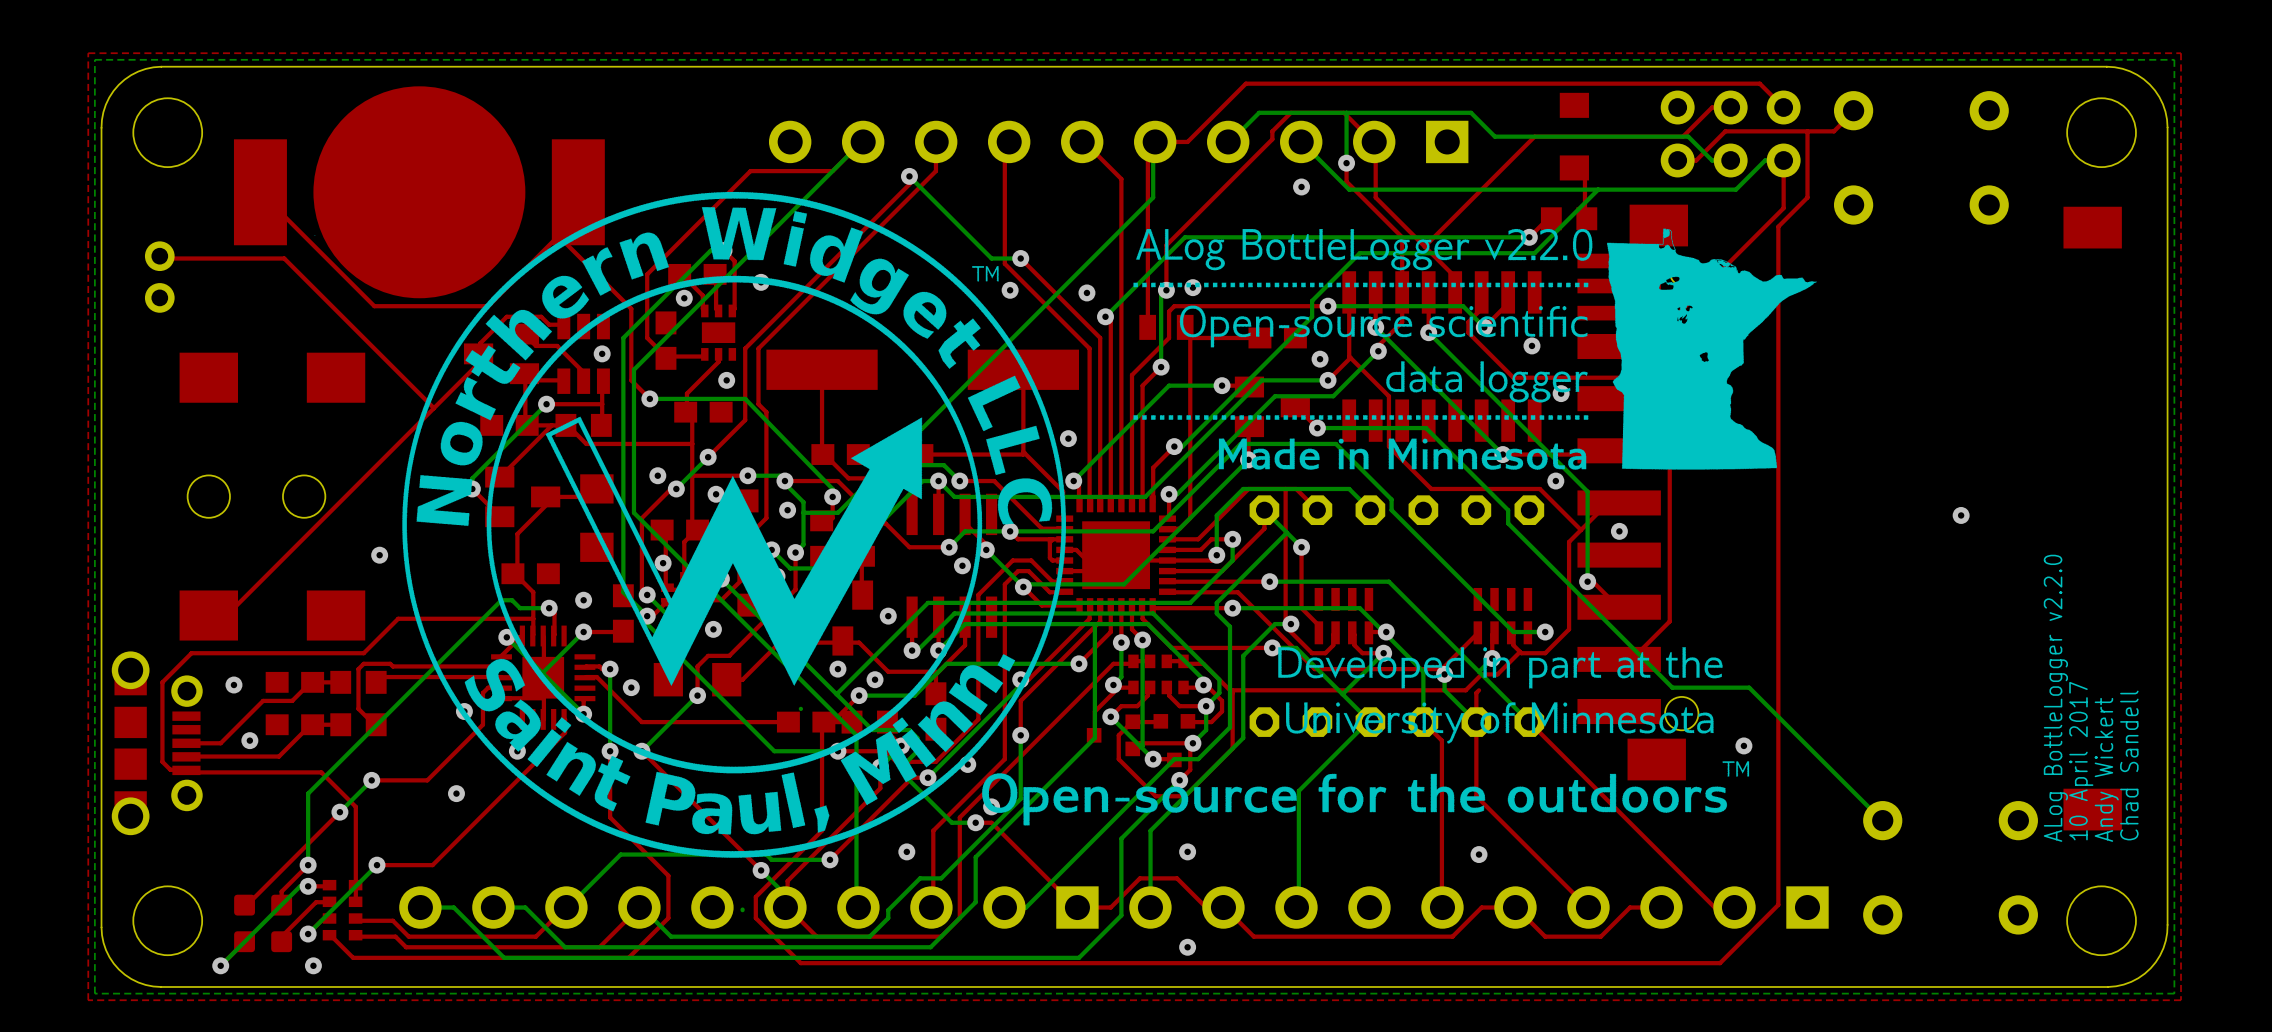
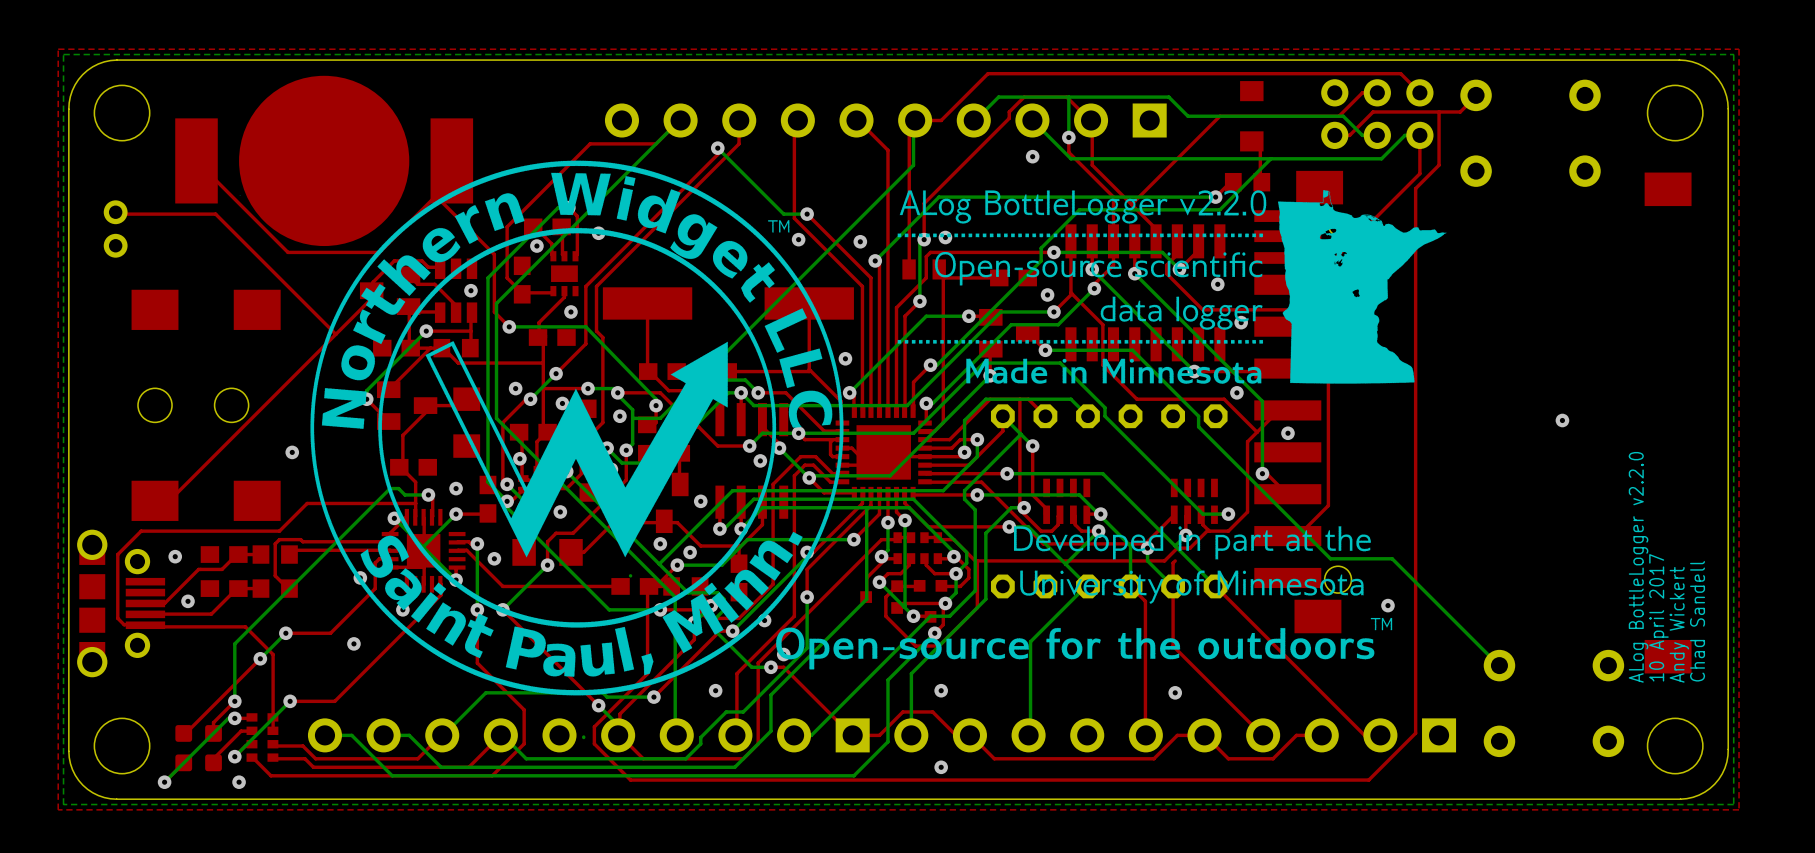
part footprint: [111, 651, 203, 836] -> [77, 529, 166, 678]

